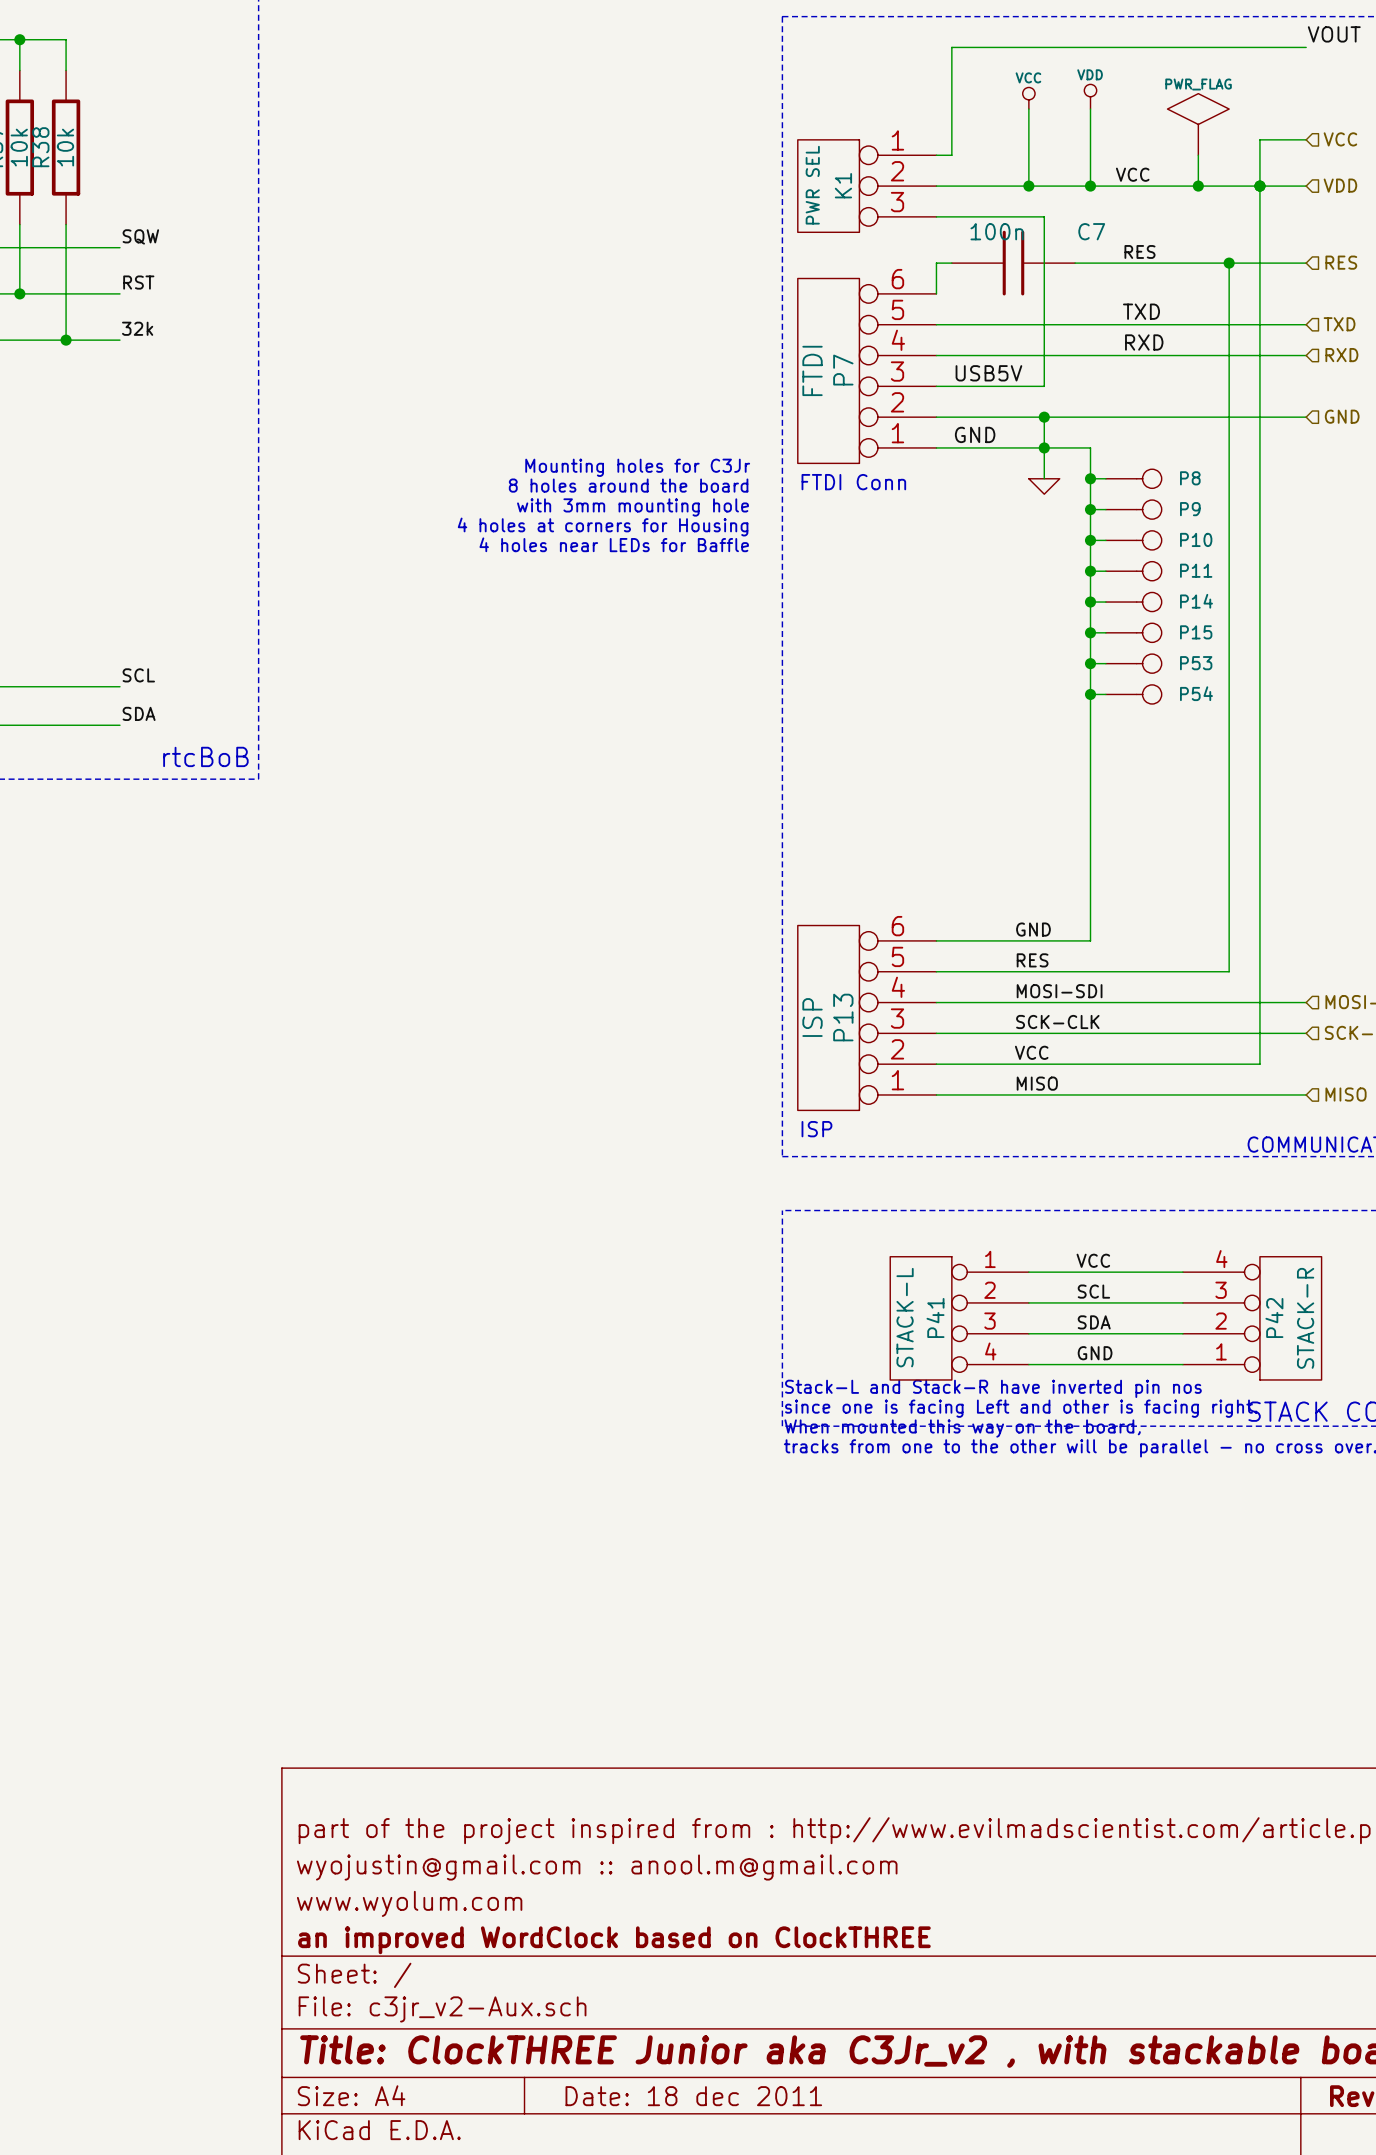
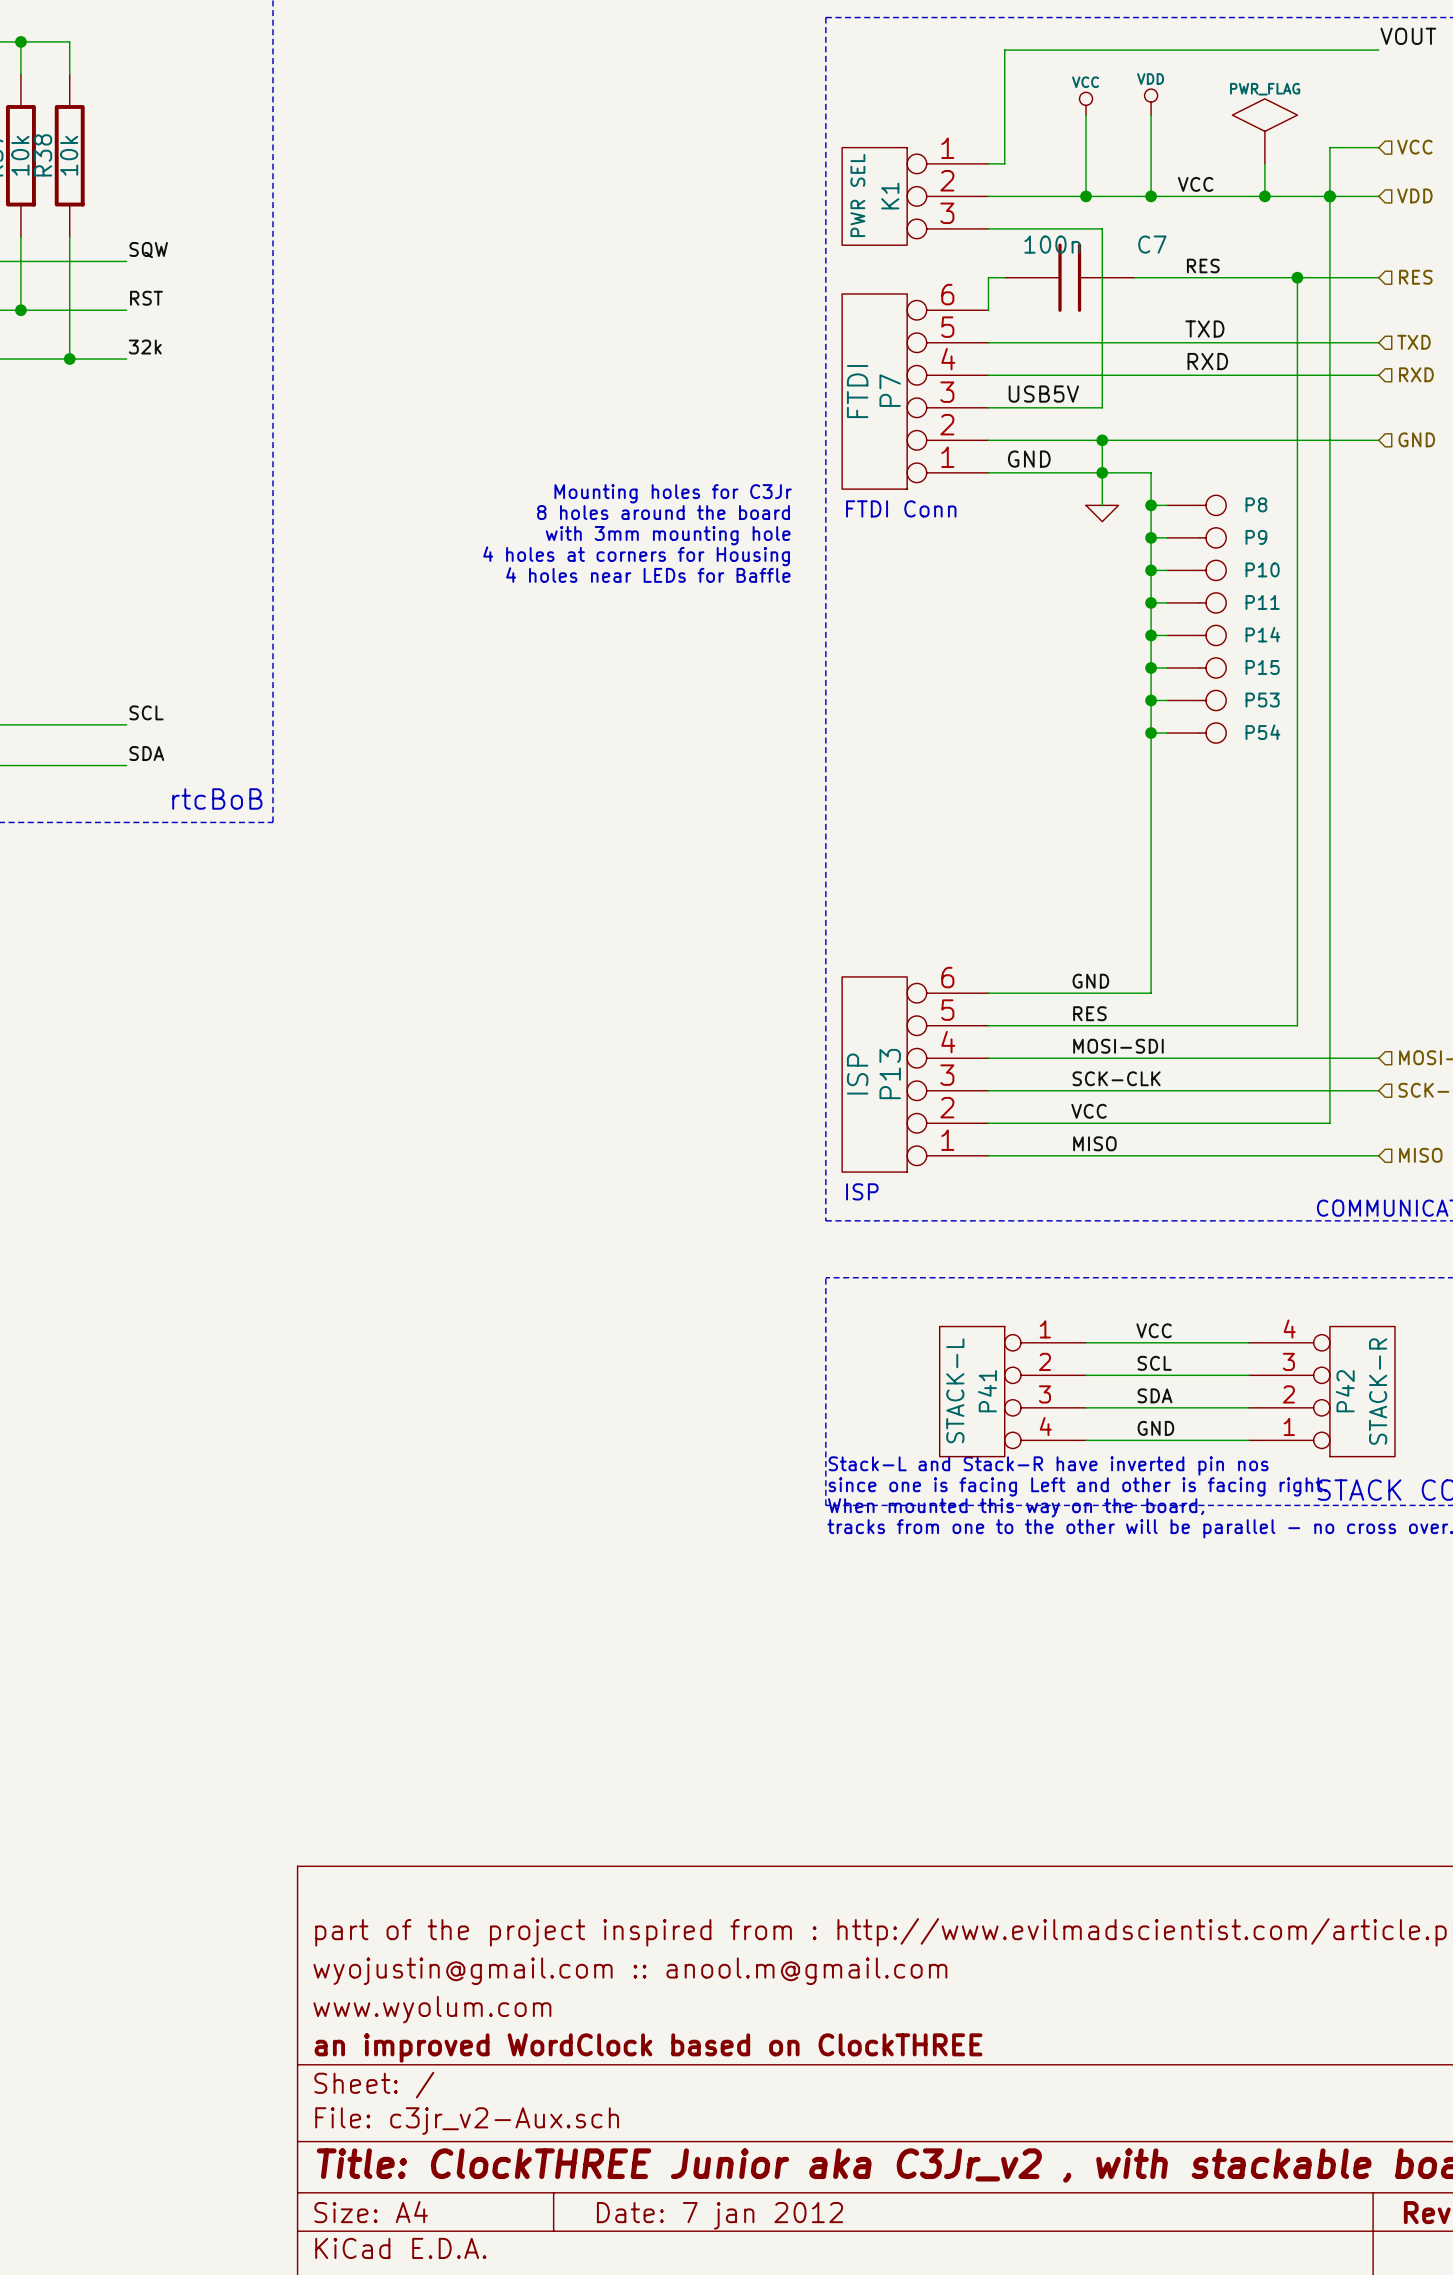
title block: Date: 18 dec 2011 (693, 2096) -> Date: 7 jan 2012 (720, 2215)

